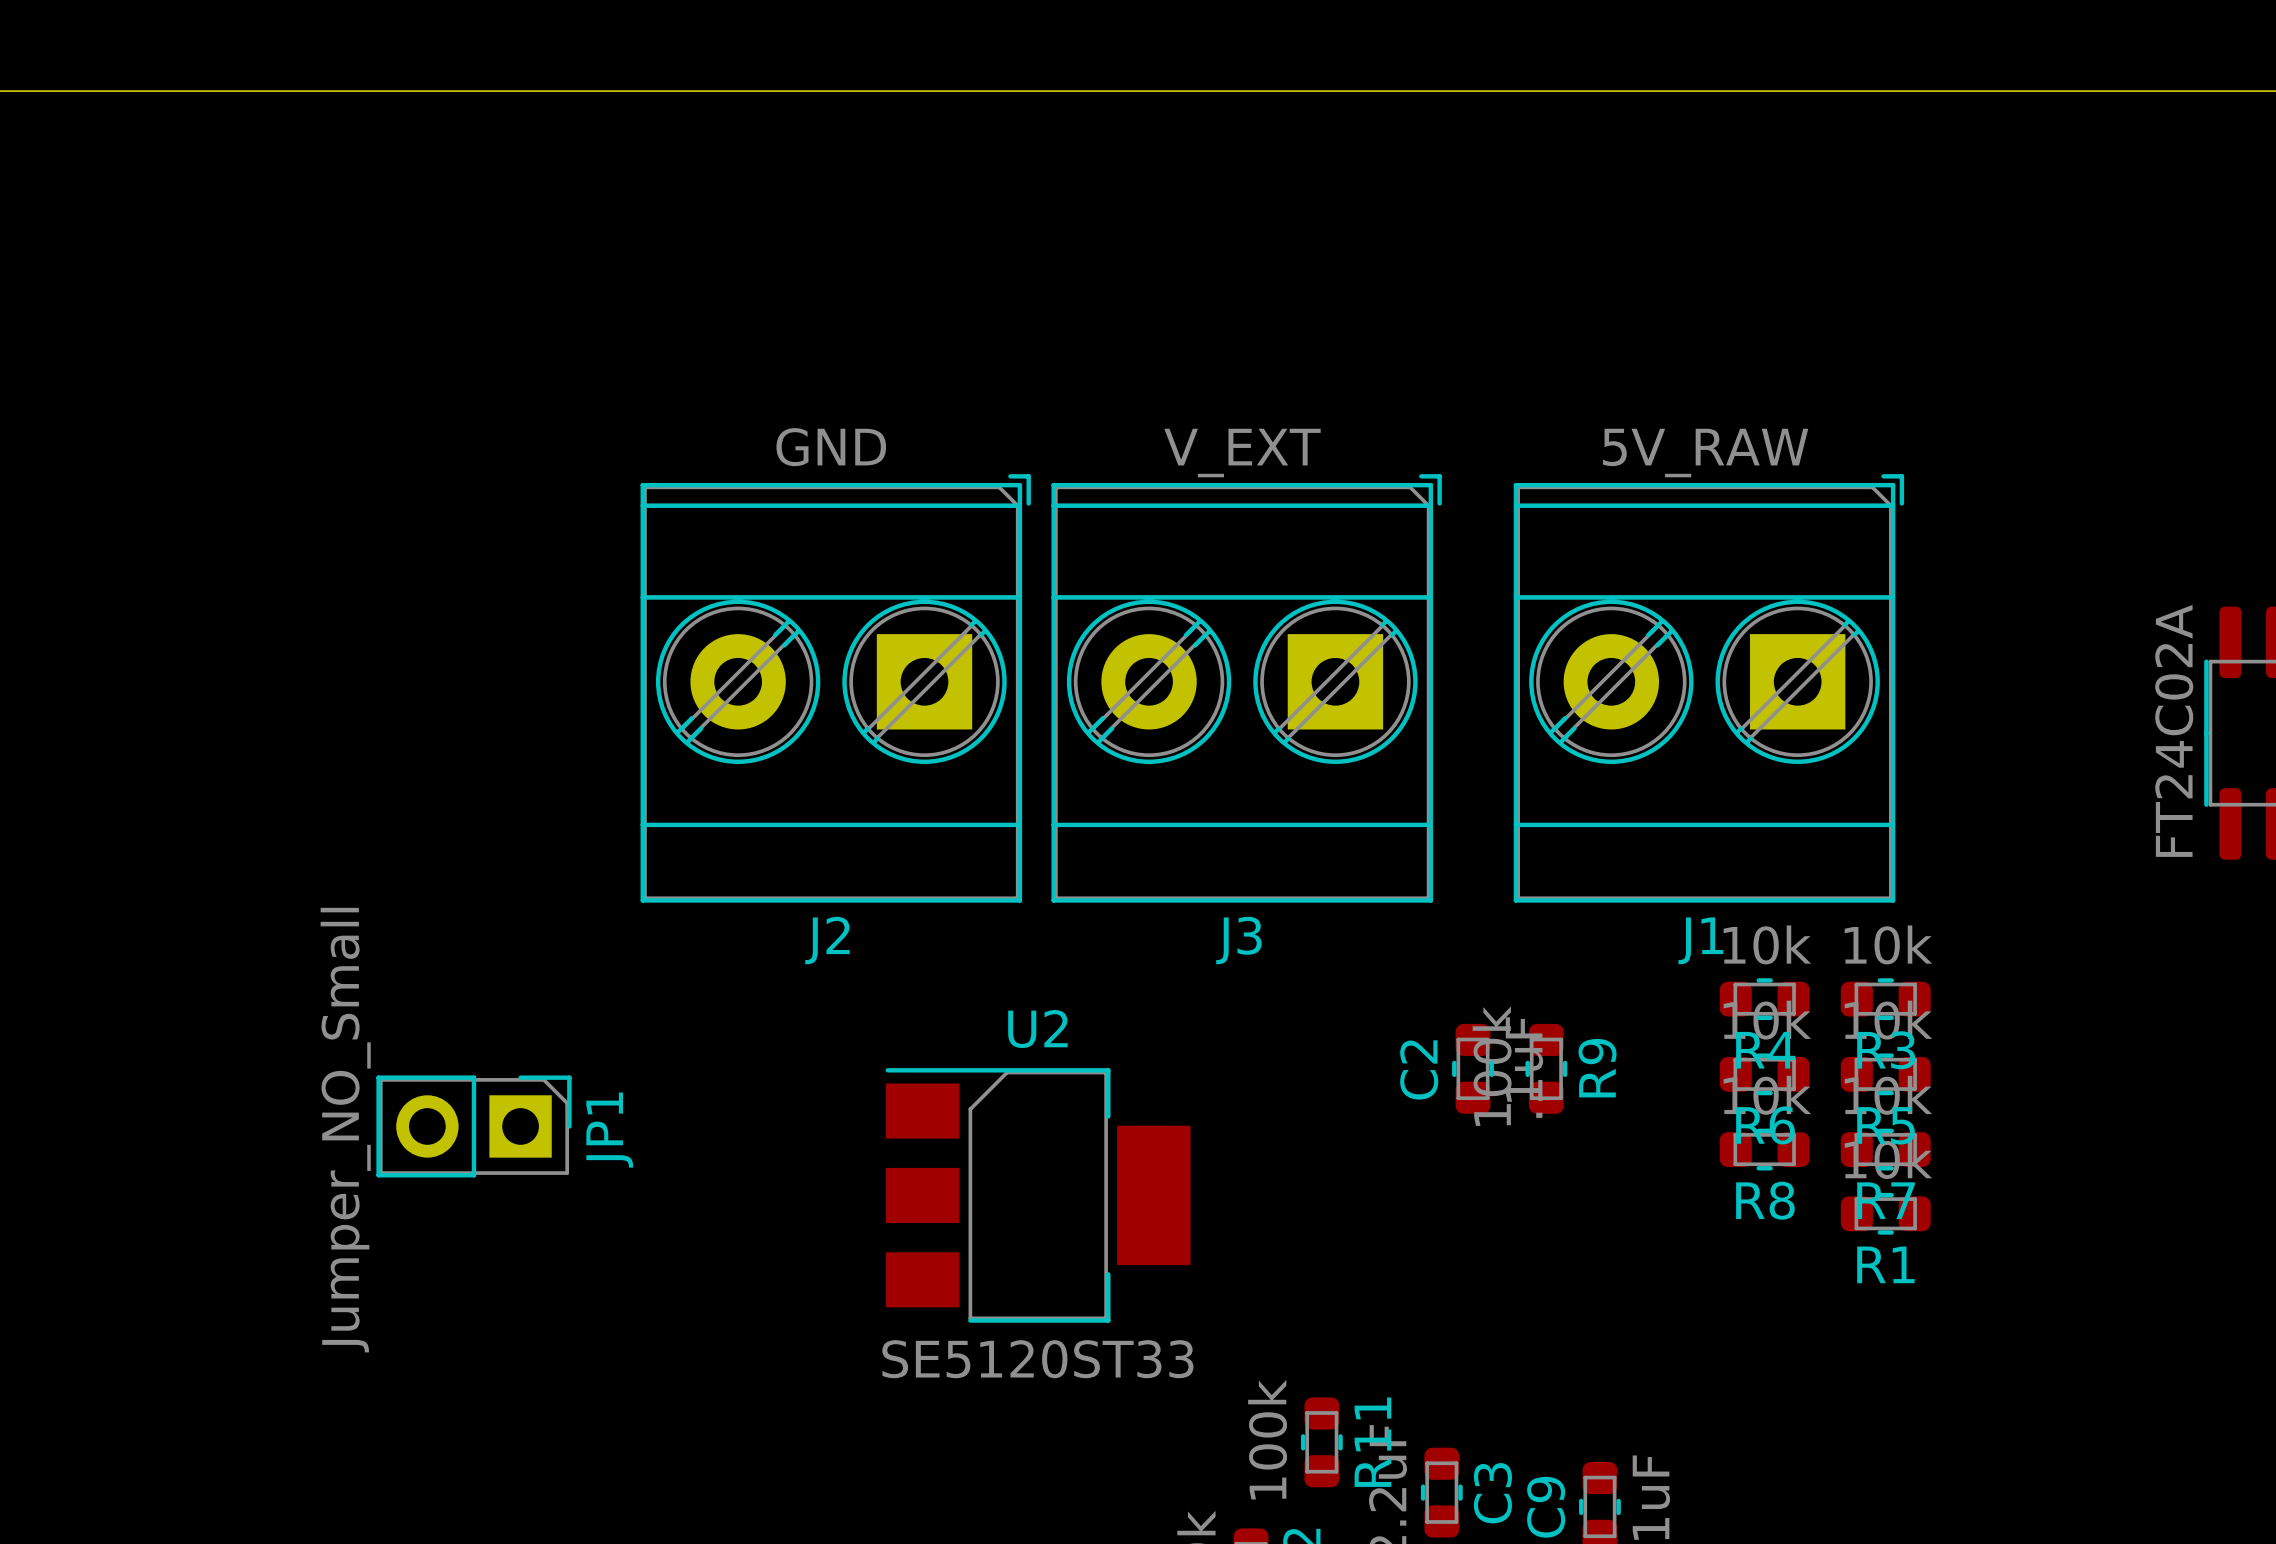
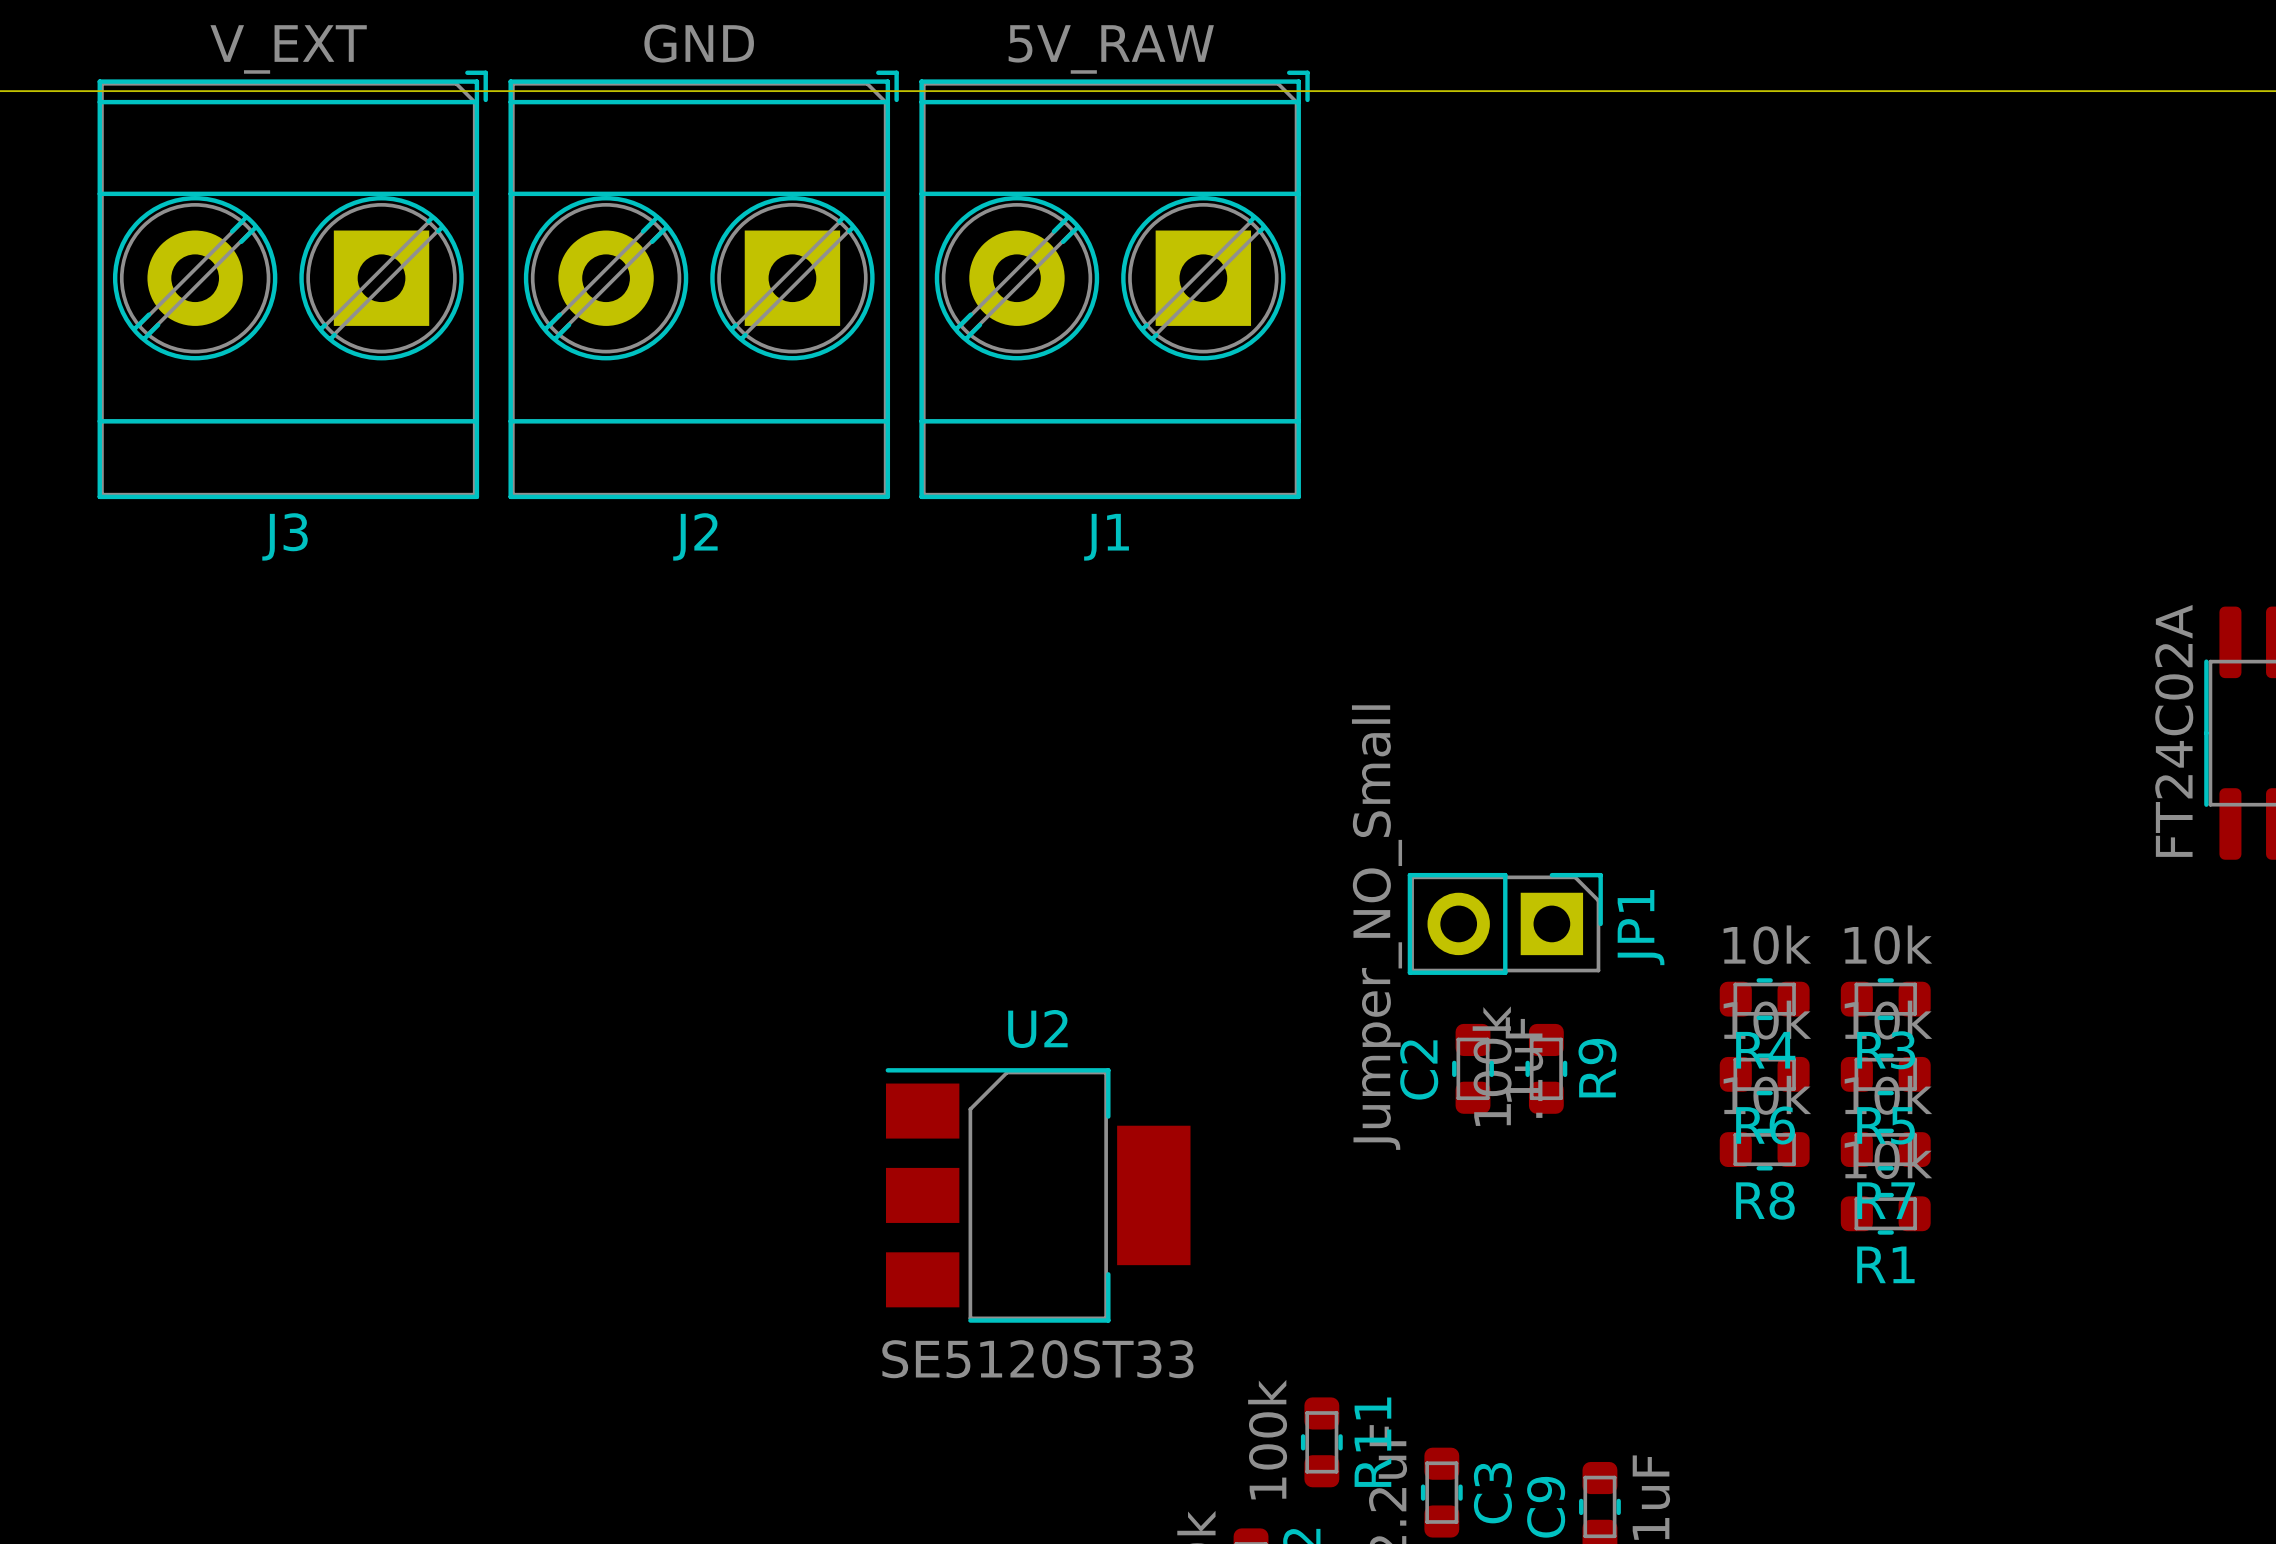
J2 position: (835, 688) -> (703, 284)
J3 position: (1246, 688) -> (292, 284)
J1 position: (1708, 688) -> (1114, 284)
JP1 position: (473, 1126) -> (1505, 923)

